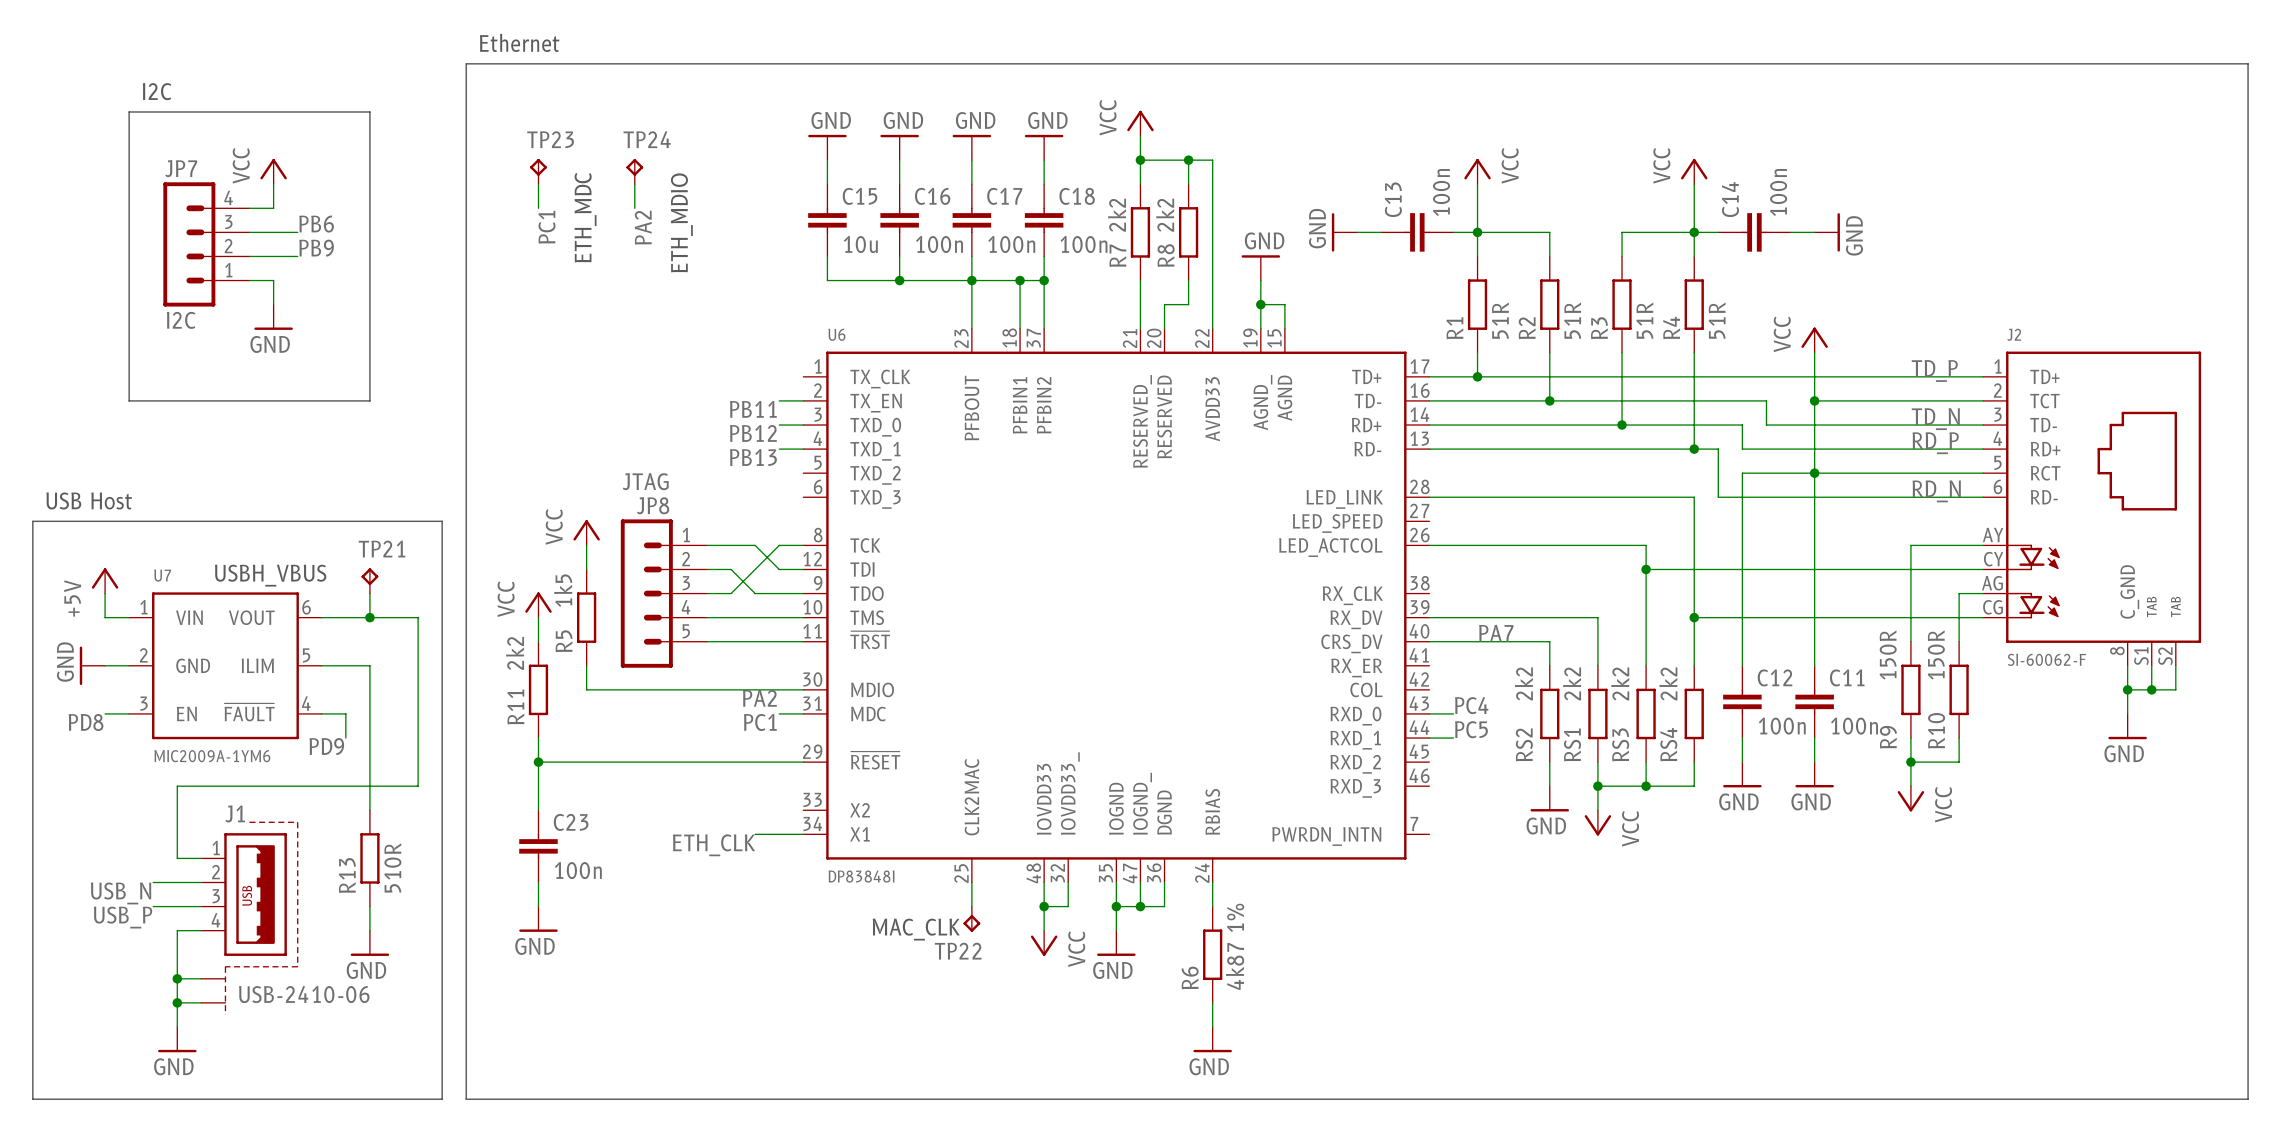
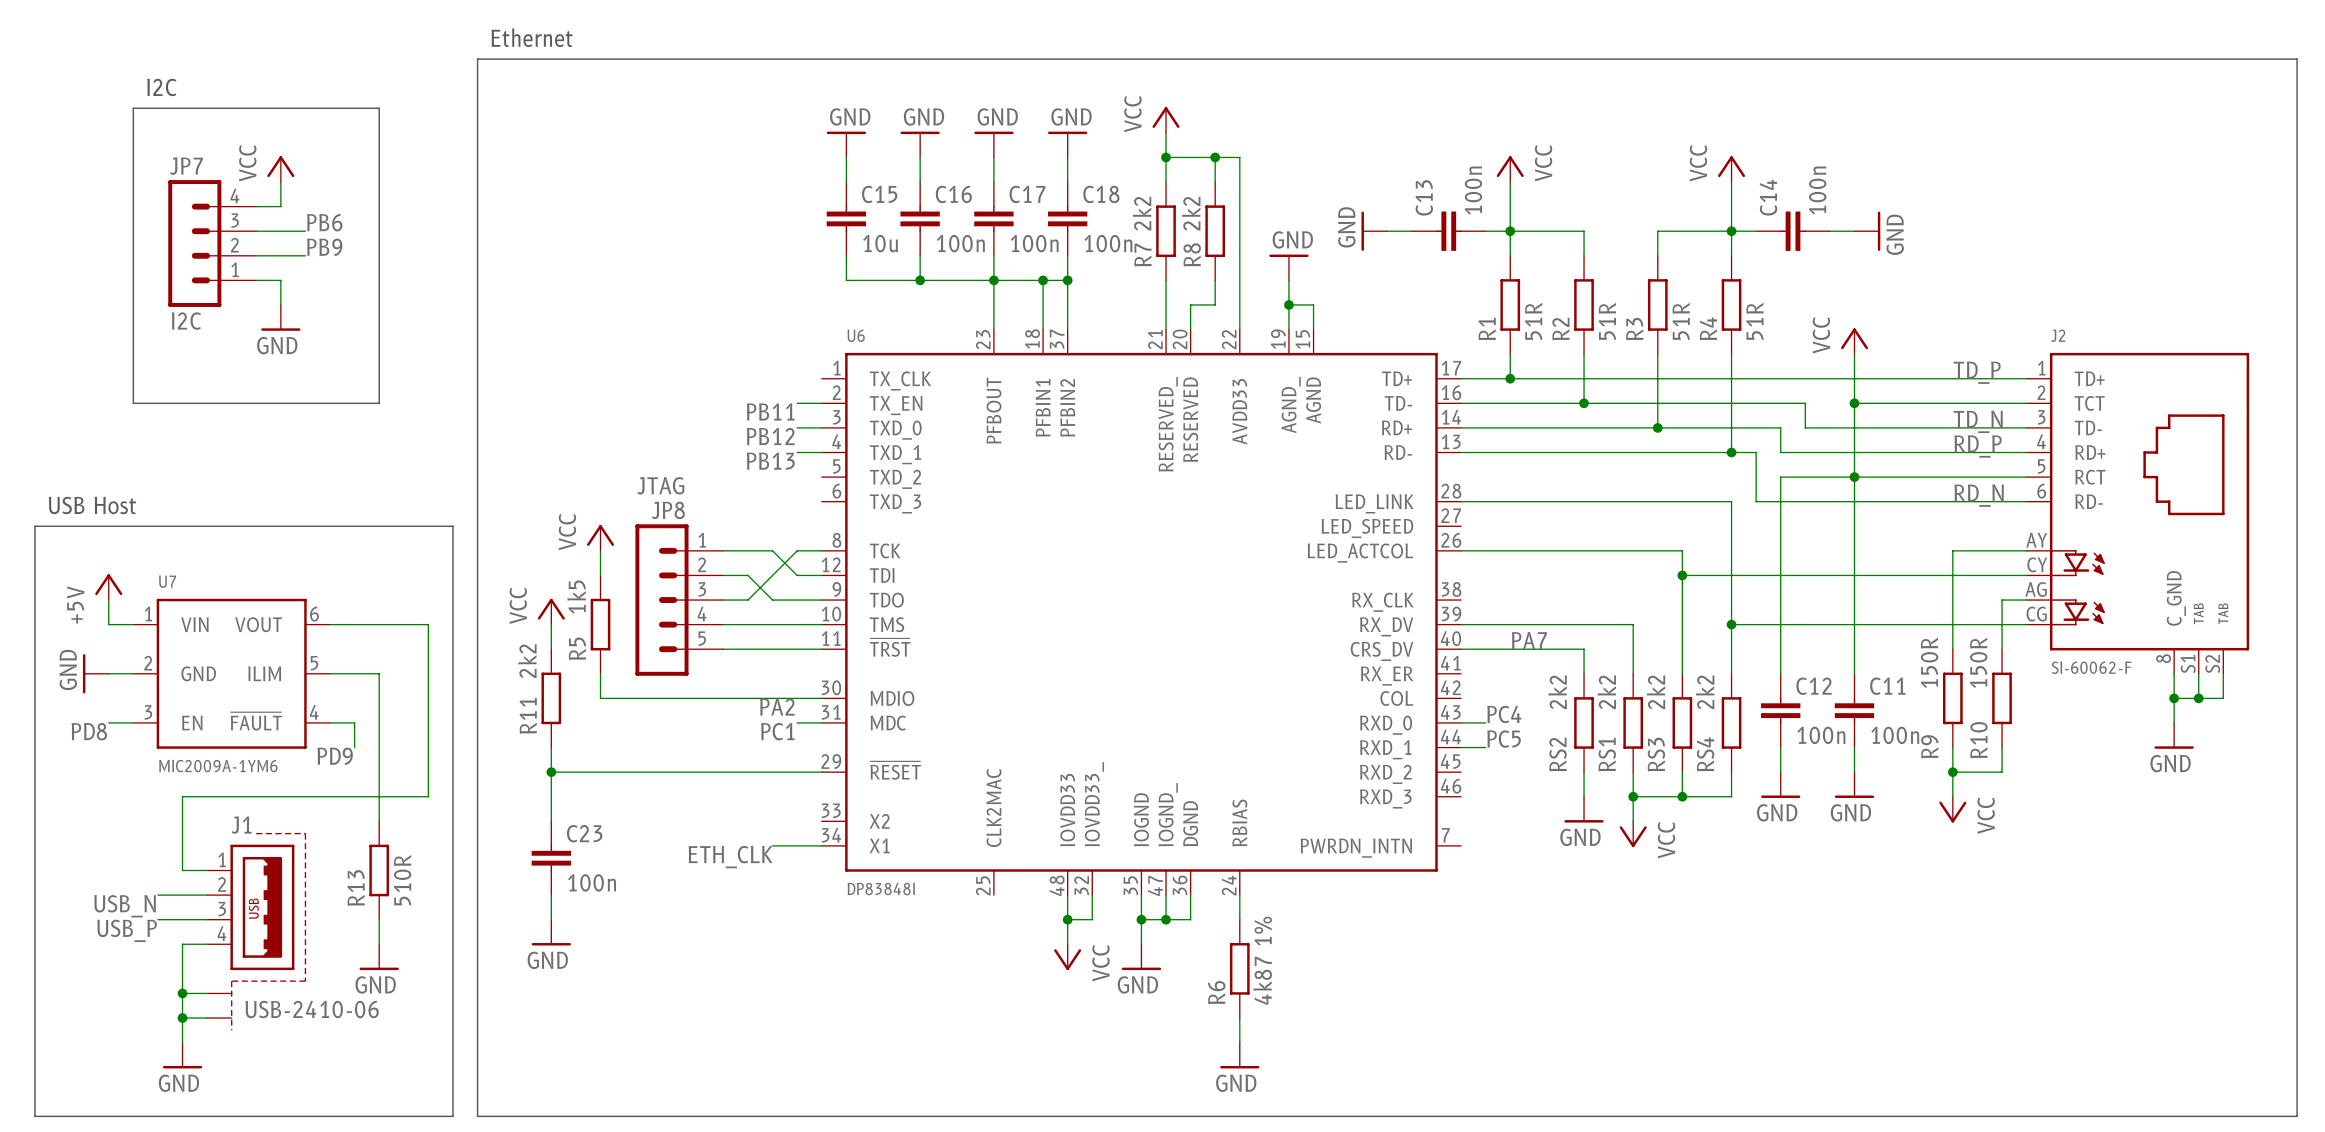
TP23: (538, 171) -> none
TP24: (634, 171) -> none
wire: (538, 184) (538, 208) -> none
wire: (634, 184) (634, 208) -> none
label: PC1 (547, 227) -> none
label: PA2 (643, 227) -> none
TP21: (369, 580) -> none
wire: (369, 593) (369, 617) -> none
junction: (369, 617) -> none
wire: (971, 882) (971, 906) -> none
TP22: (971, 919) -> none

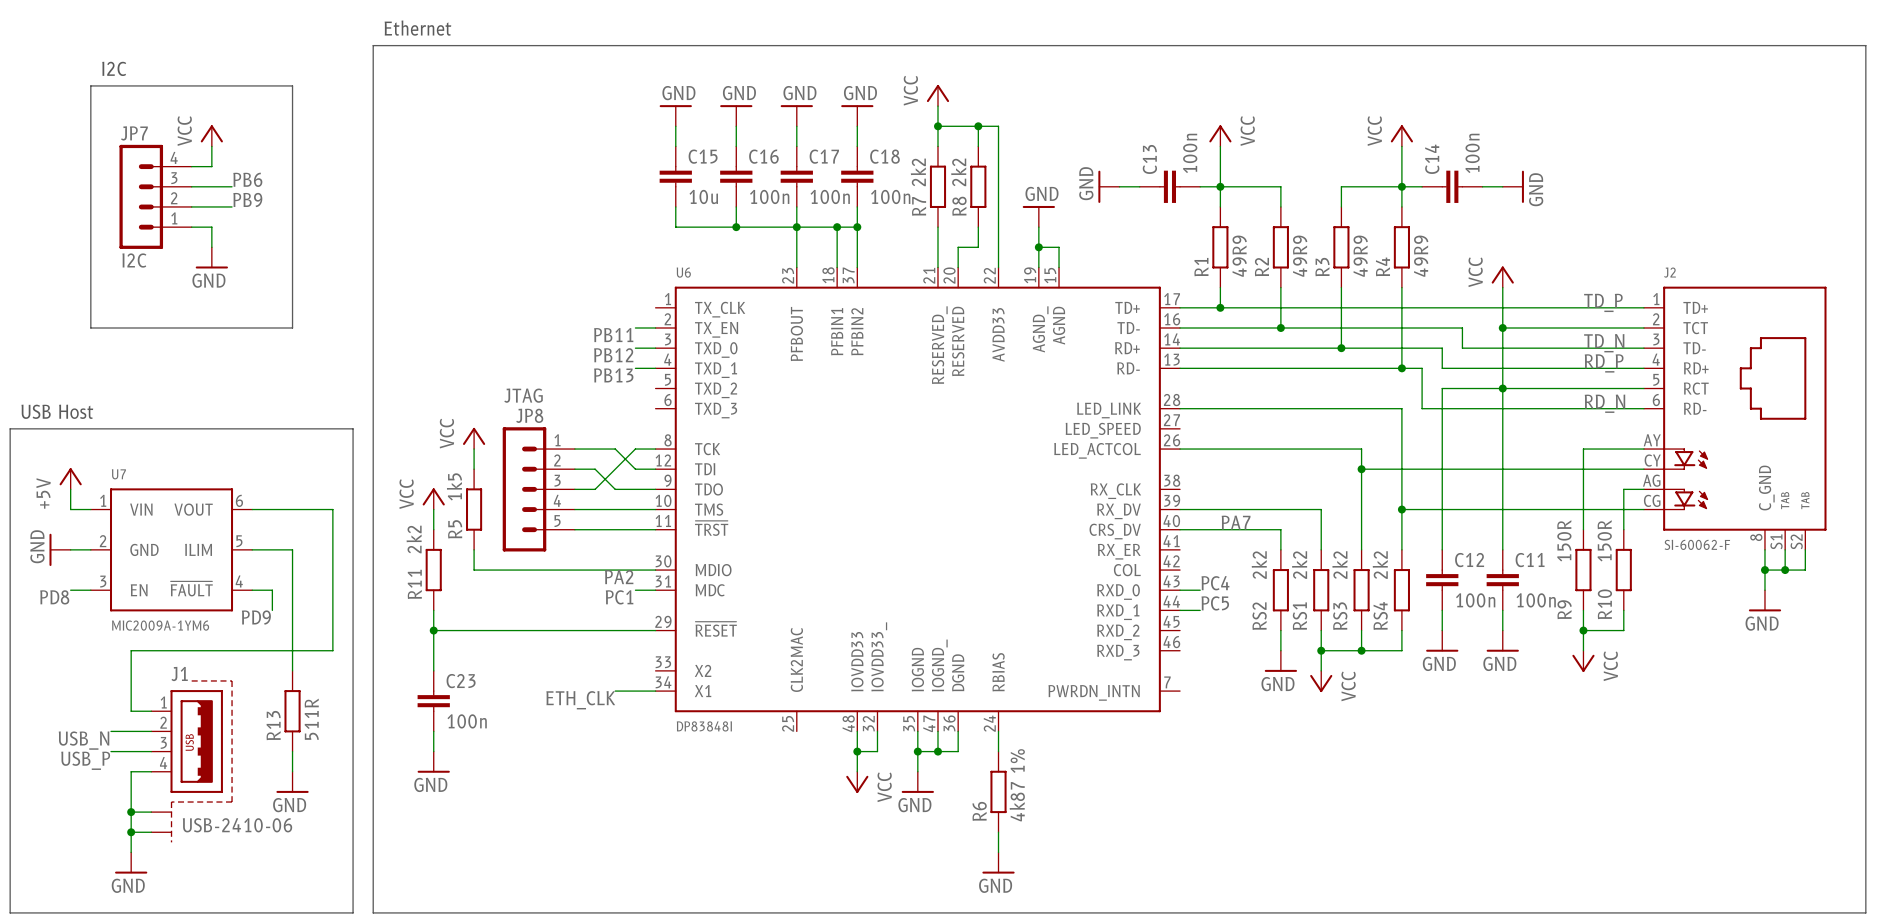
R1 value: 51R (1533, 321) -> 49R9 (1239, 256)
R2 value: 51R (1607, 321) -> 49R9 (1300, 256)
R3 value: 51R (1681, 321) -> 49R9 (1360, 256)
R4 value: 51R (1754, 321) -> 49R9 (1421, 256)
R13 value: 510R (402, 880) -> 511R (311, 719)

